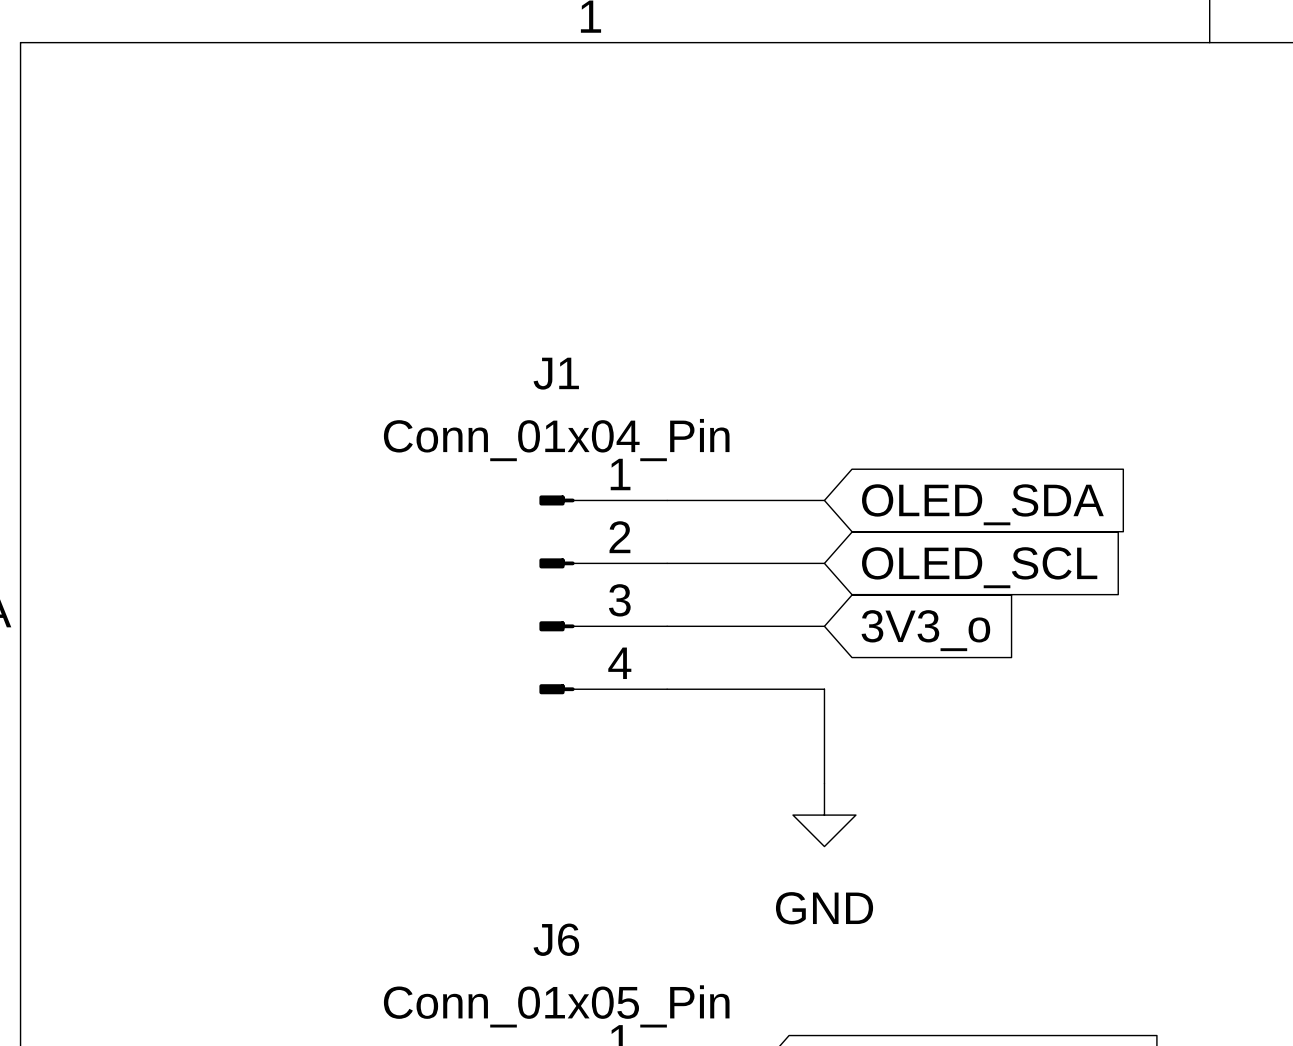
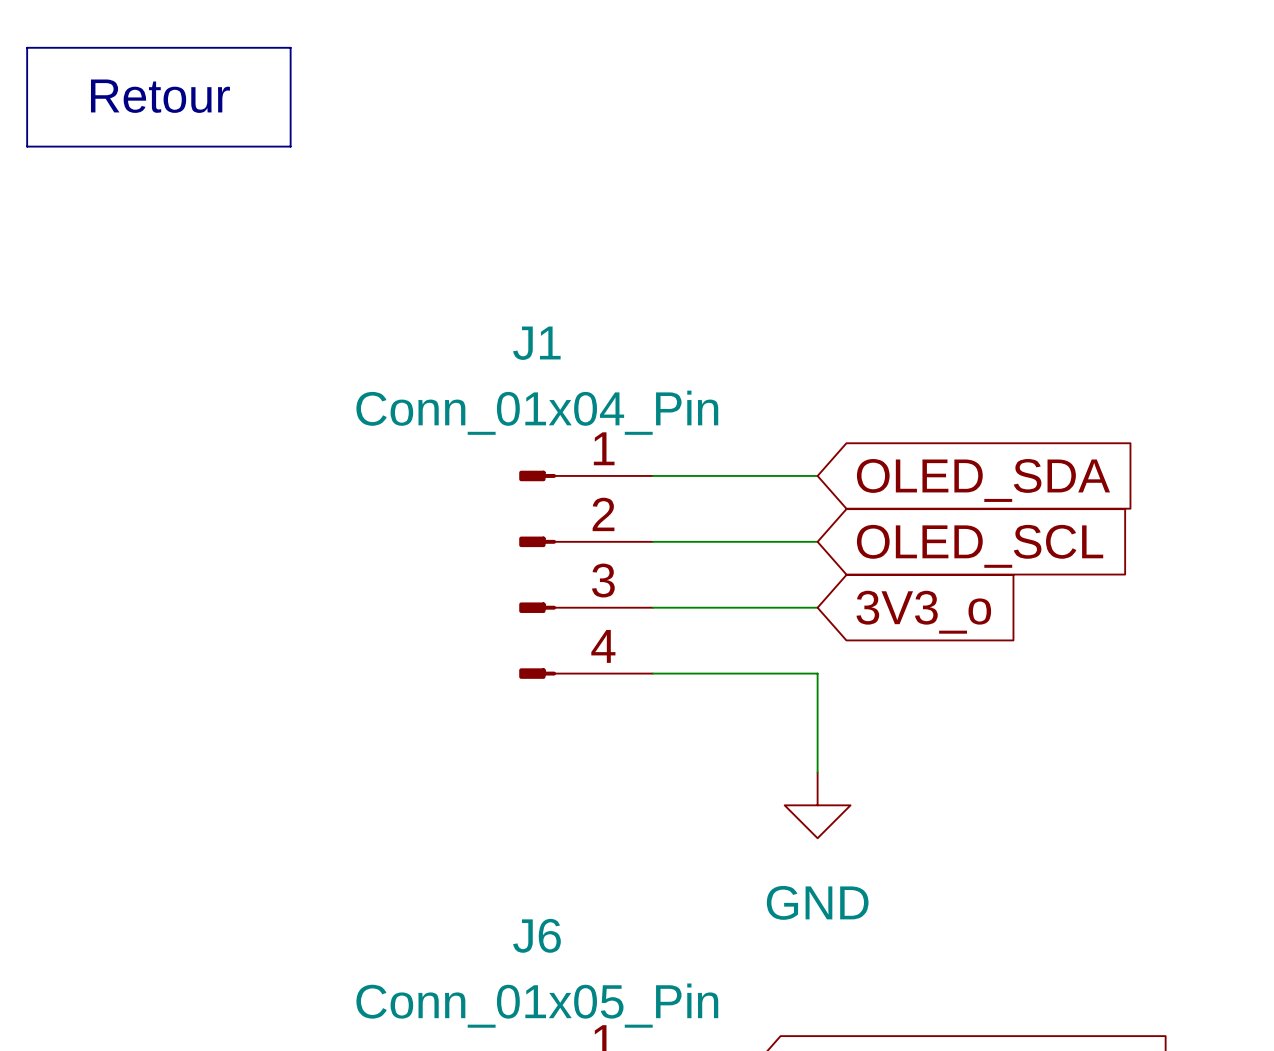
line: none -> (27, 47) (290, 47) (290, 146) (27, 146) (27, 47)
text: none -> Retour (160, 96)

